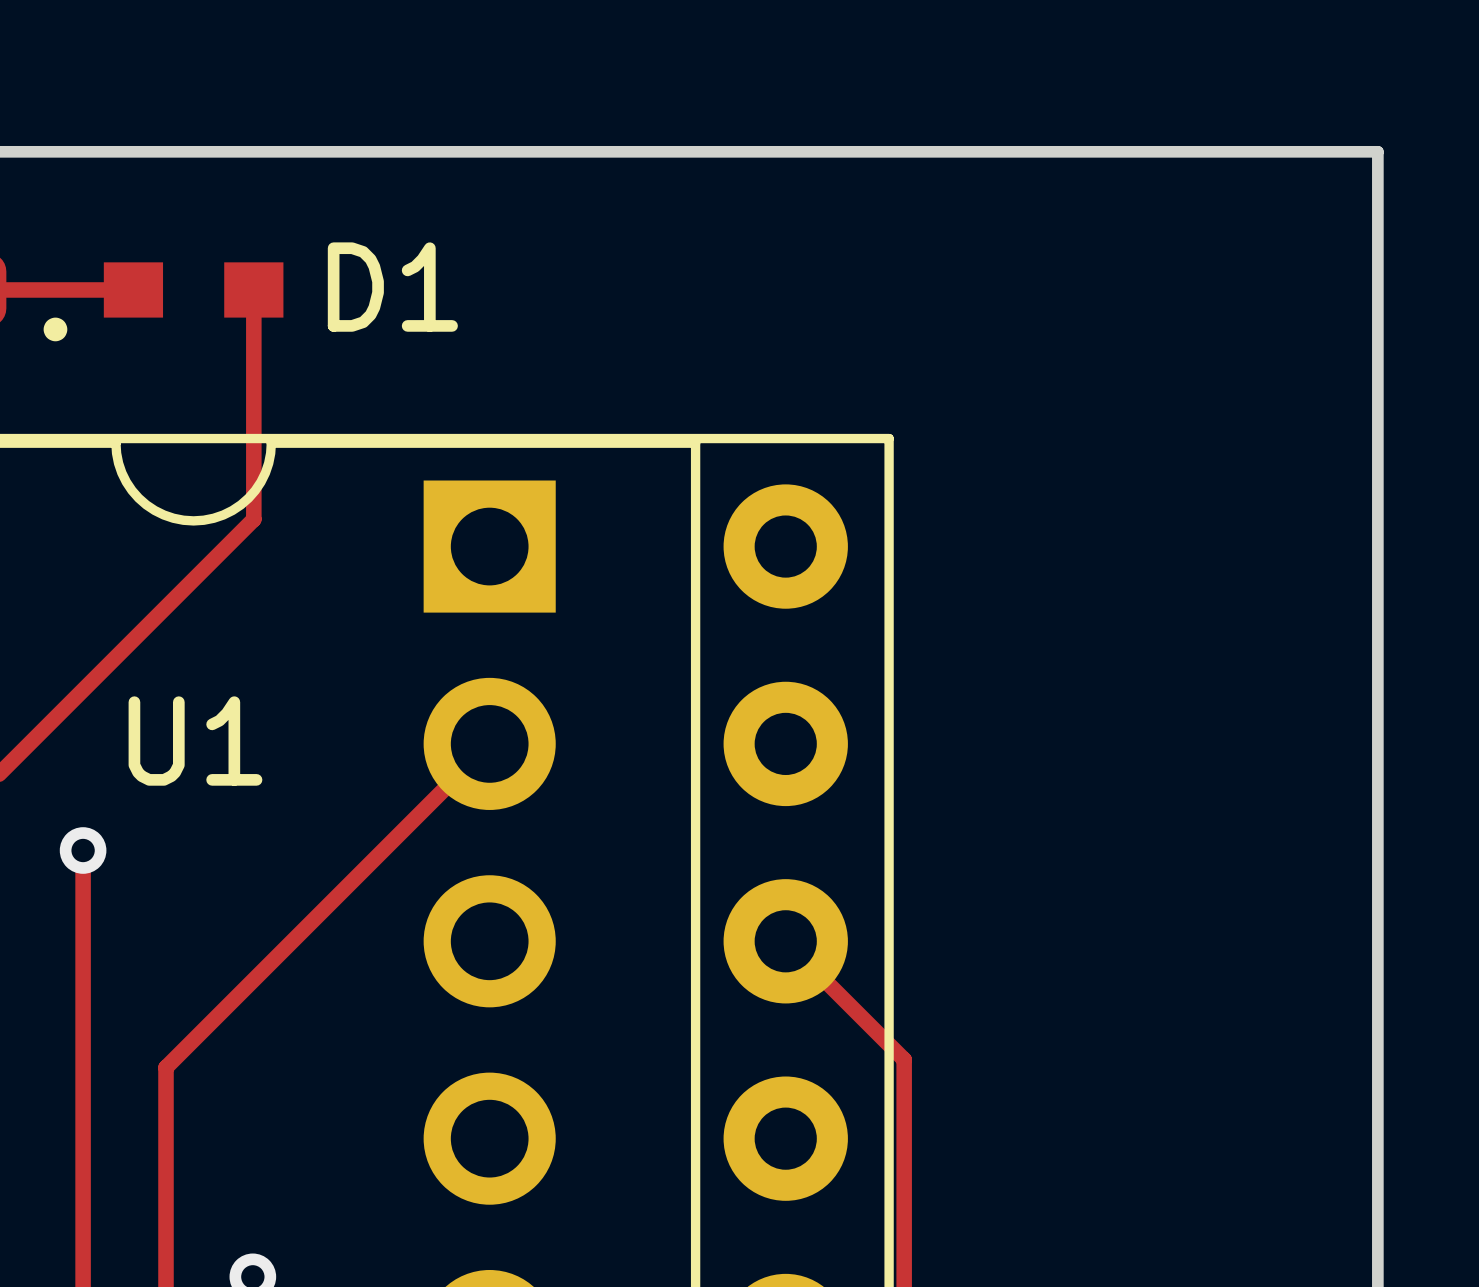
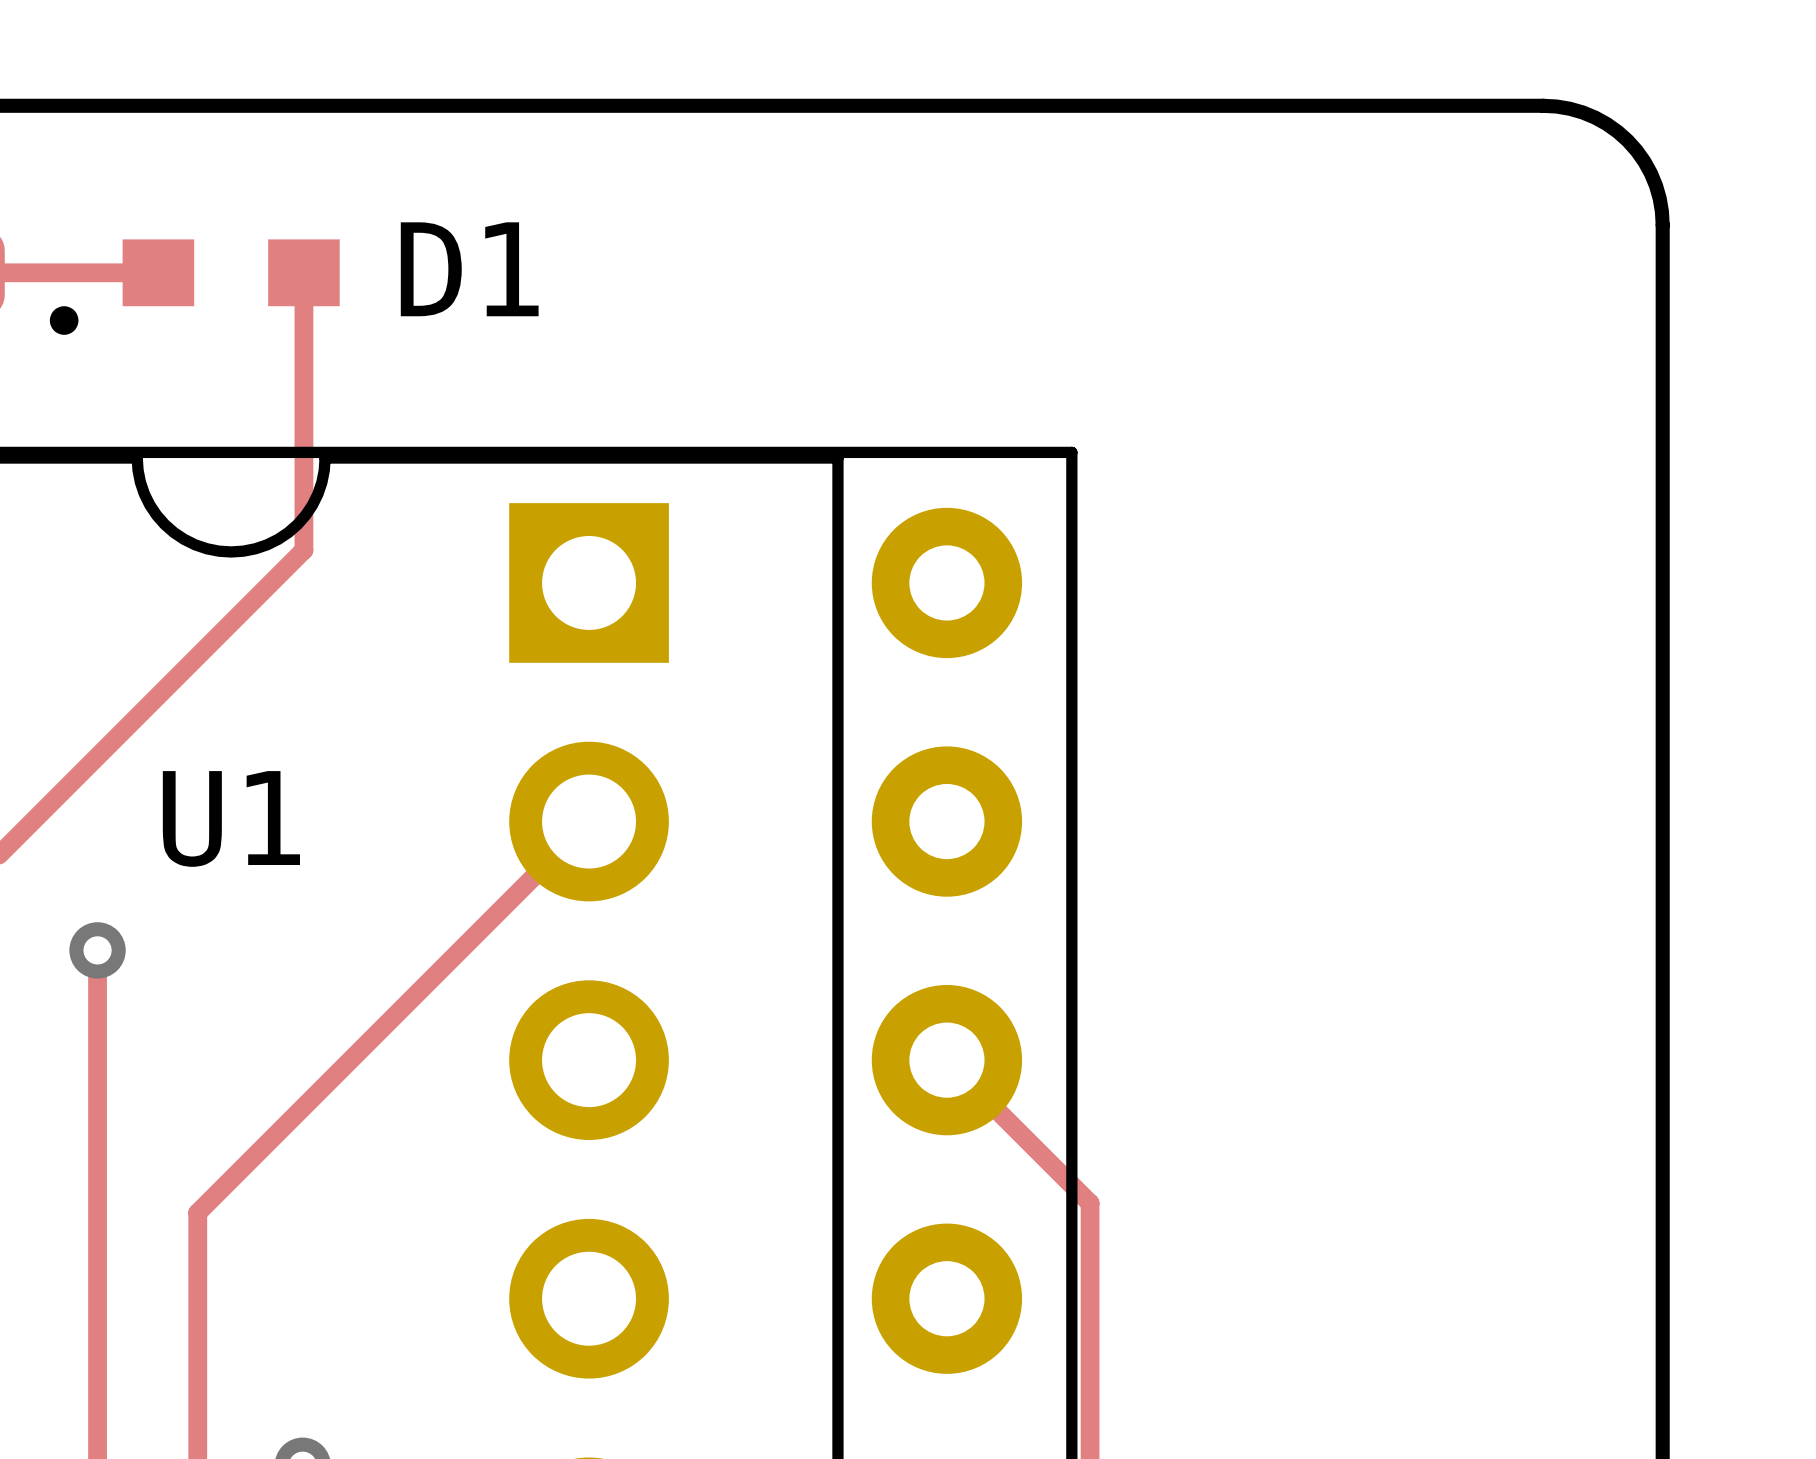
board edge: (1279, 151) (1377, 151) (1377, 250) -> (1543, 105) (1569, 108) (1595, 117) (1627, 140) (1650, 173) (1659, 198) (1662, 225)

